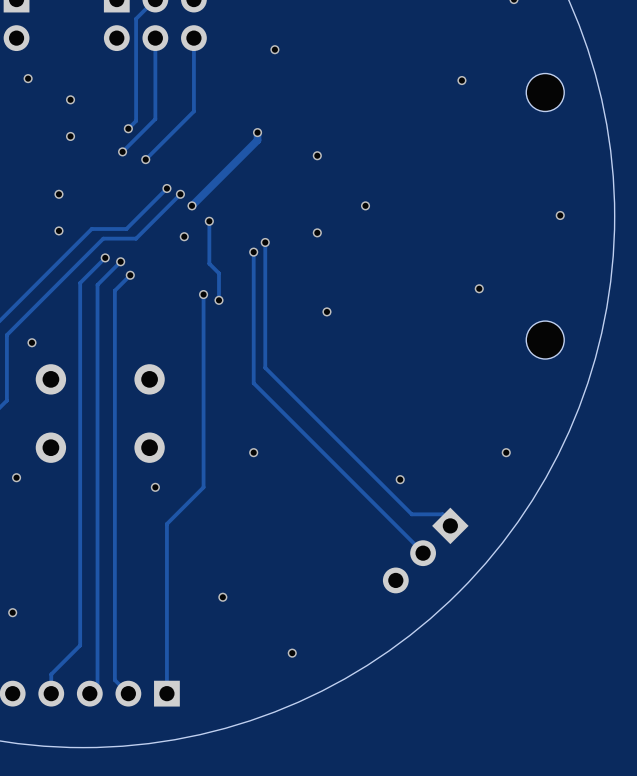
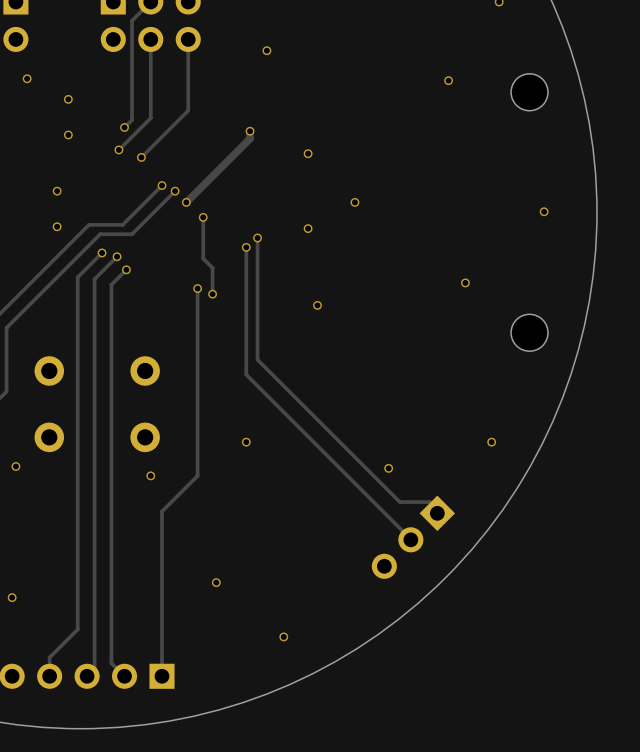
via: (184, 236) -> none
via: (31, 342) -> none

